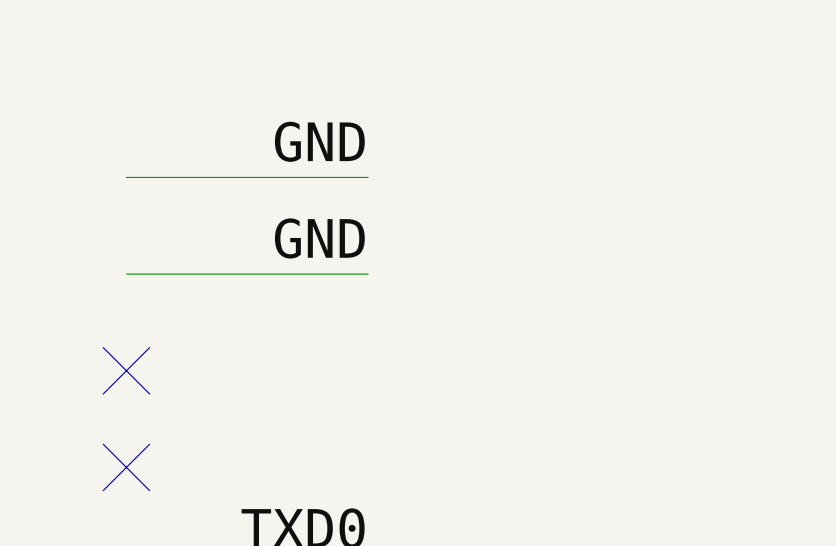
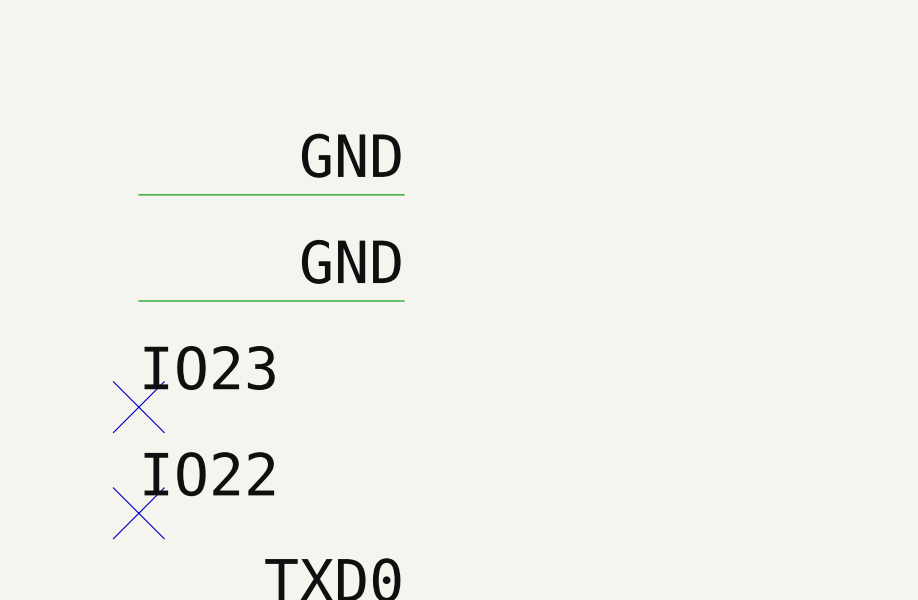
label: none -> IO23 (209, 368)
label: none -> IO22 (209, 474)

